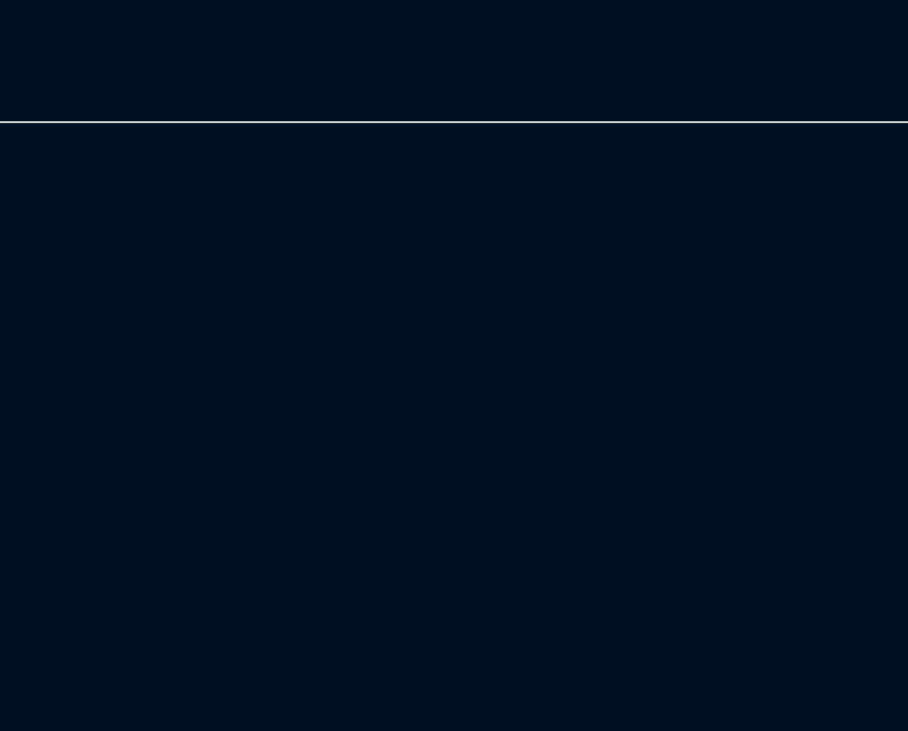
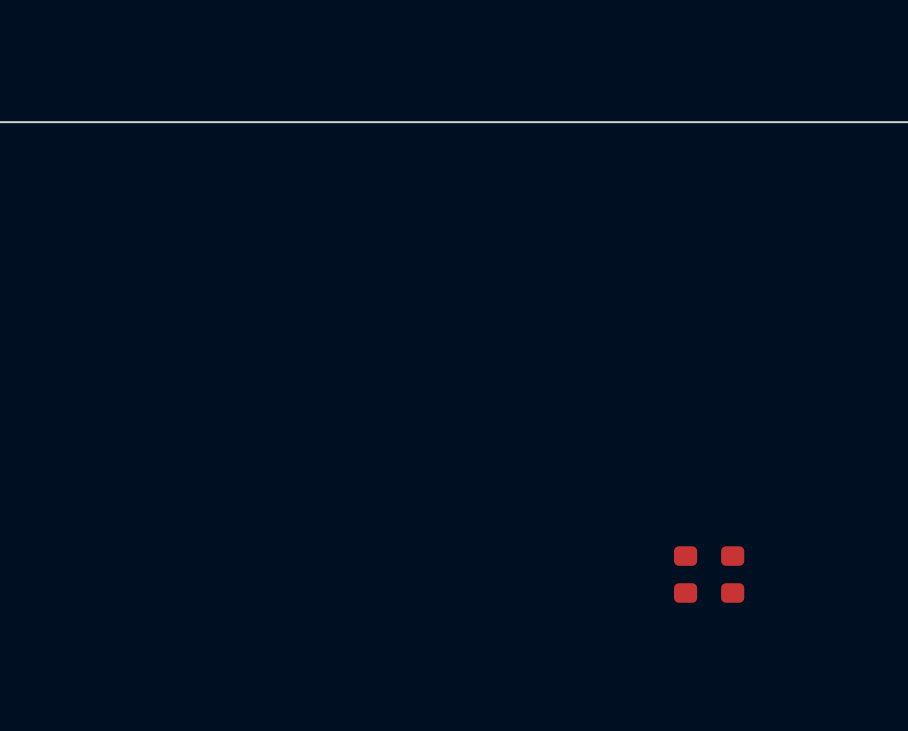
part: none -> (685, 574)
part: none -> (732, 574)

